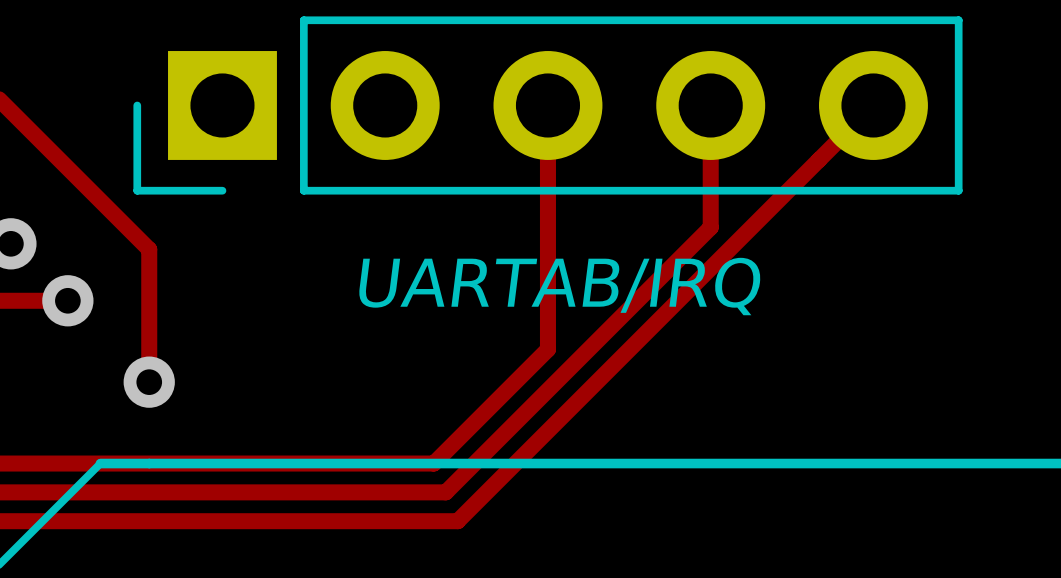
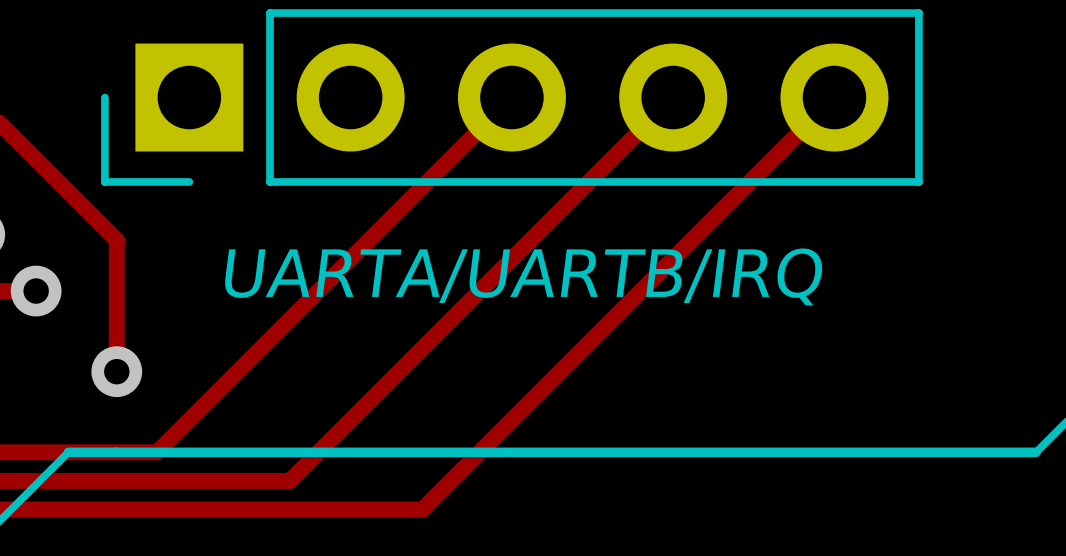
track: (547, 105) (547, 349) (433, 463) (189, 463) -> (511, 97) (157, 452)
track: (710, 105) (710, 227) (445, 492) (323, 492) -> (673, 97) (289, 480)
part value: UARTAB/IRQ (559, 286) -> UARTA/UARTB/IRQ (523, 276)

